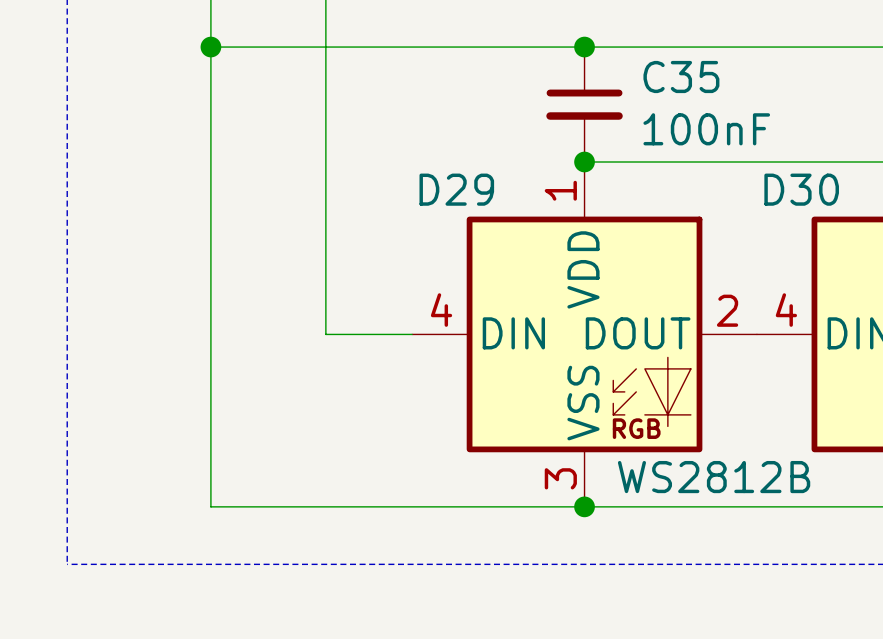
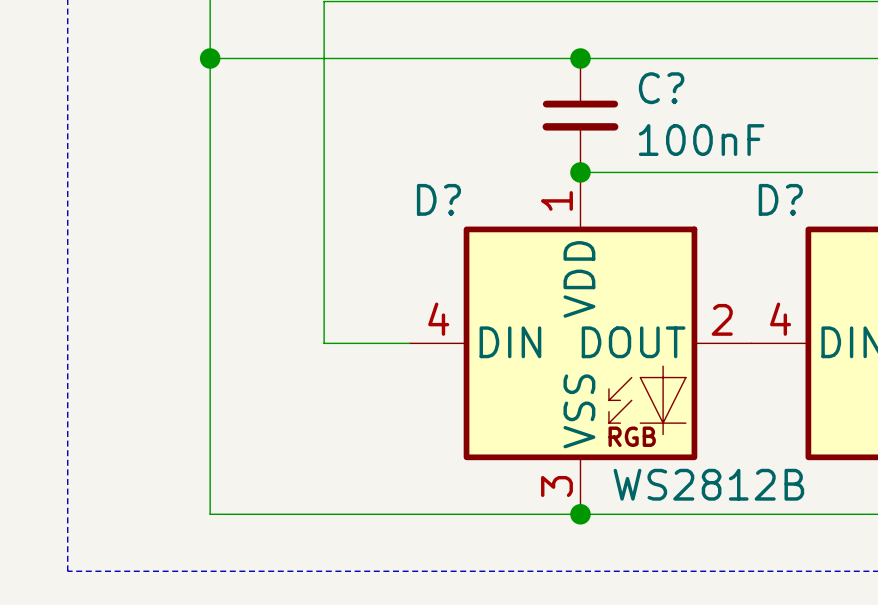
C35 name: C35 (681, 77) -> C? (661, 88)
D29 name: D29 (456, 189) -> D? (438, 199)
D30 name: D30 (801, 189) -> D? (780, 199)

